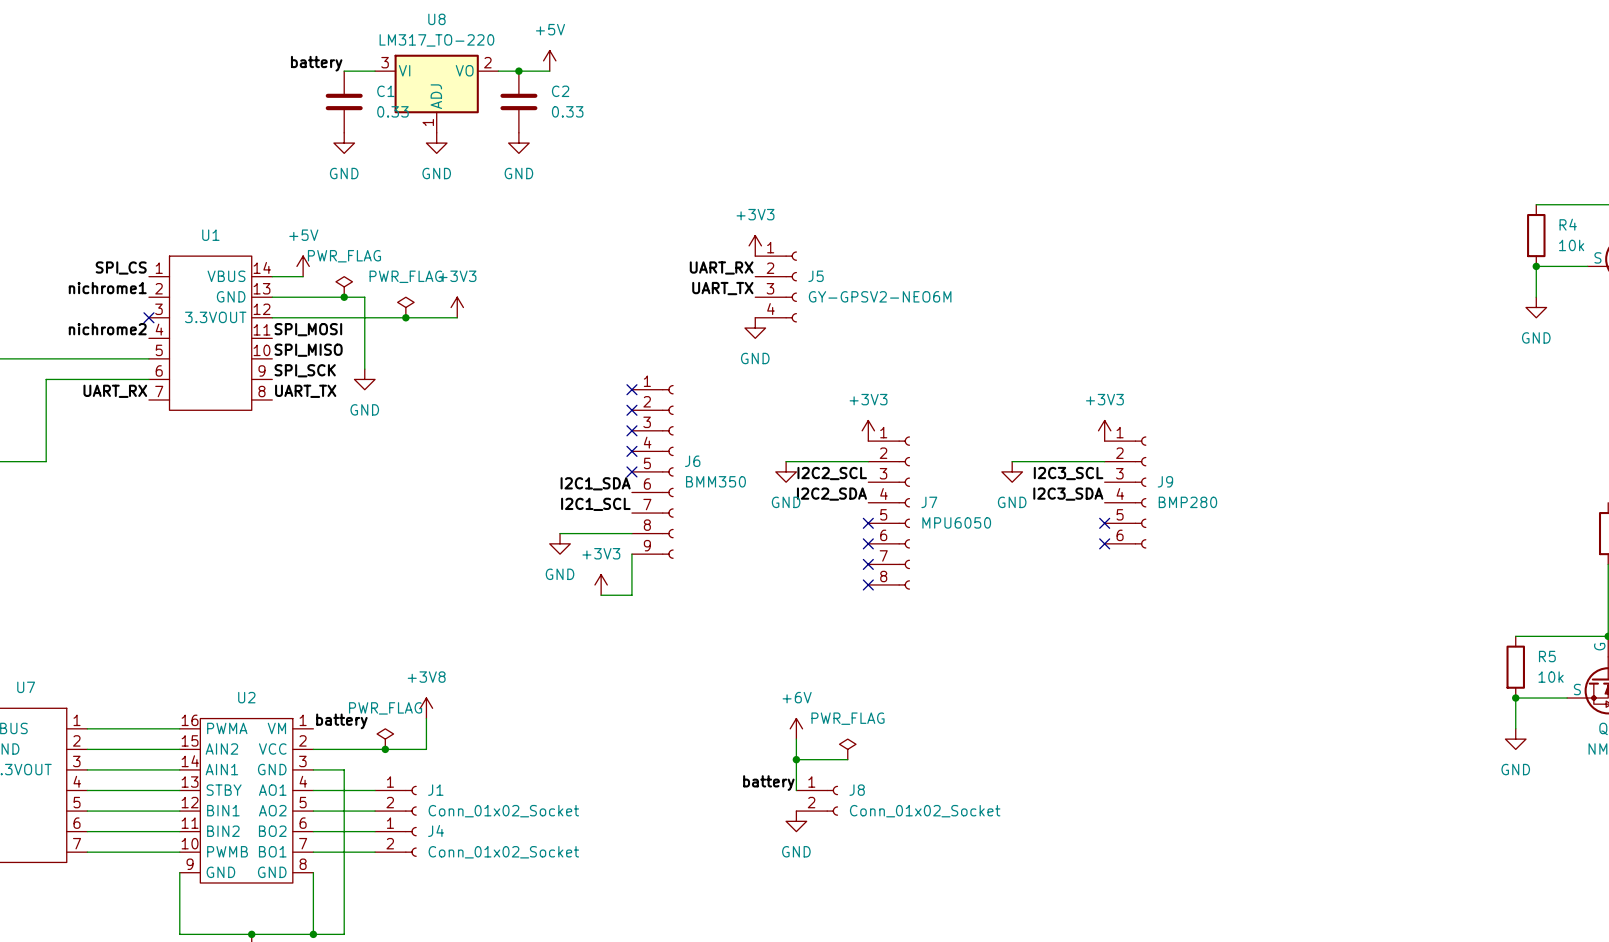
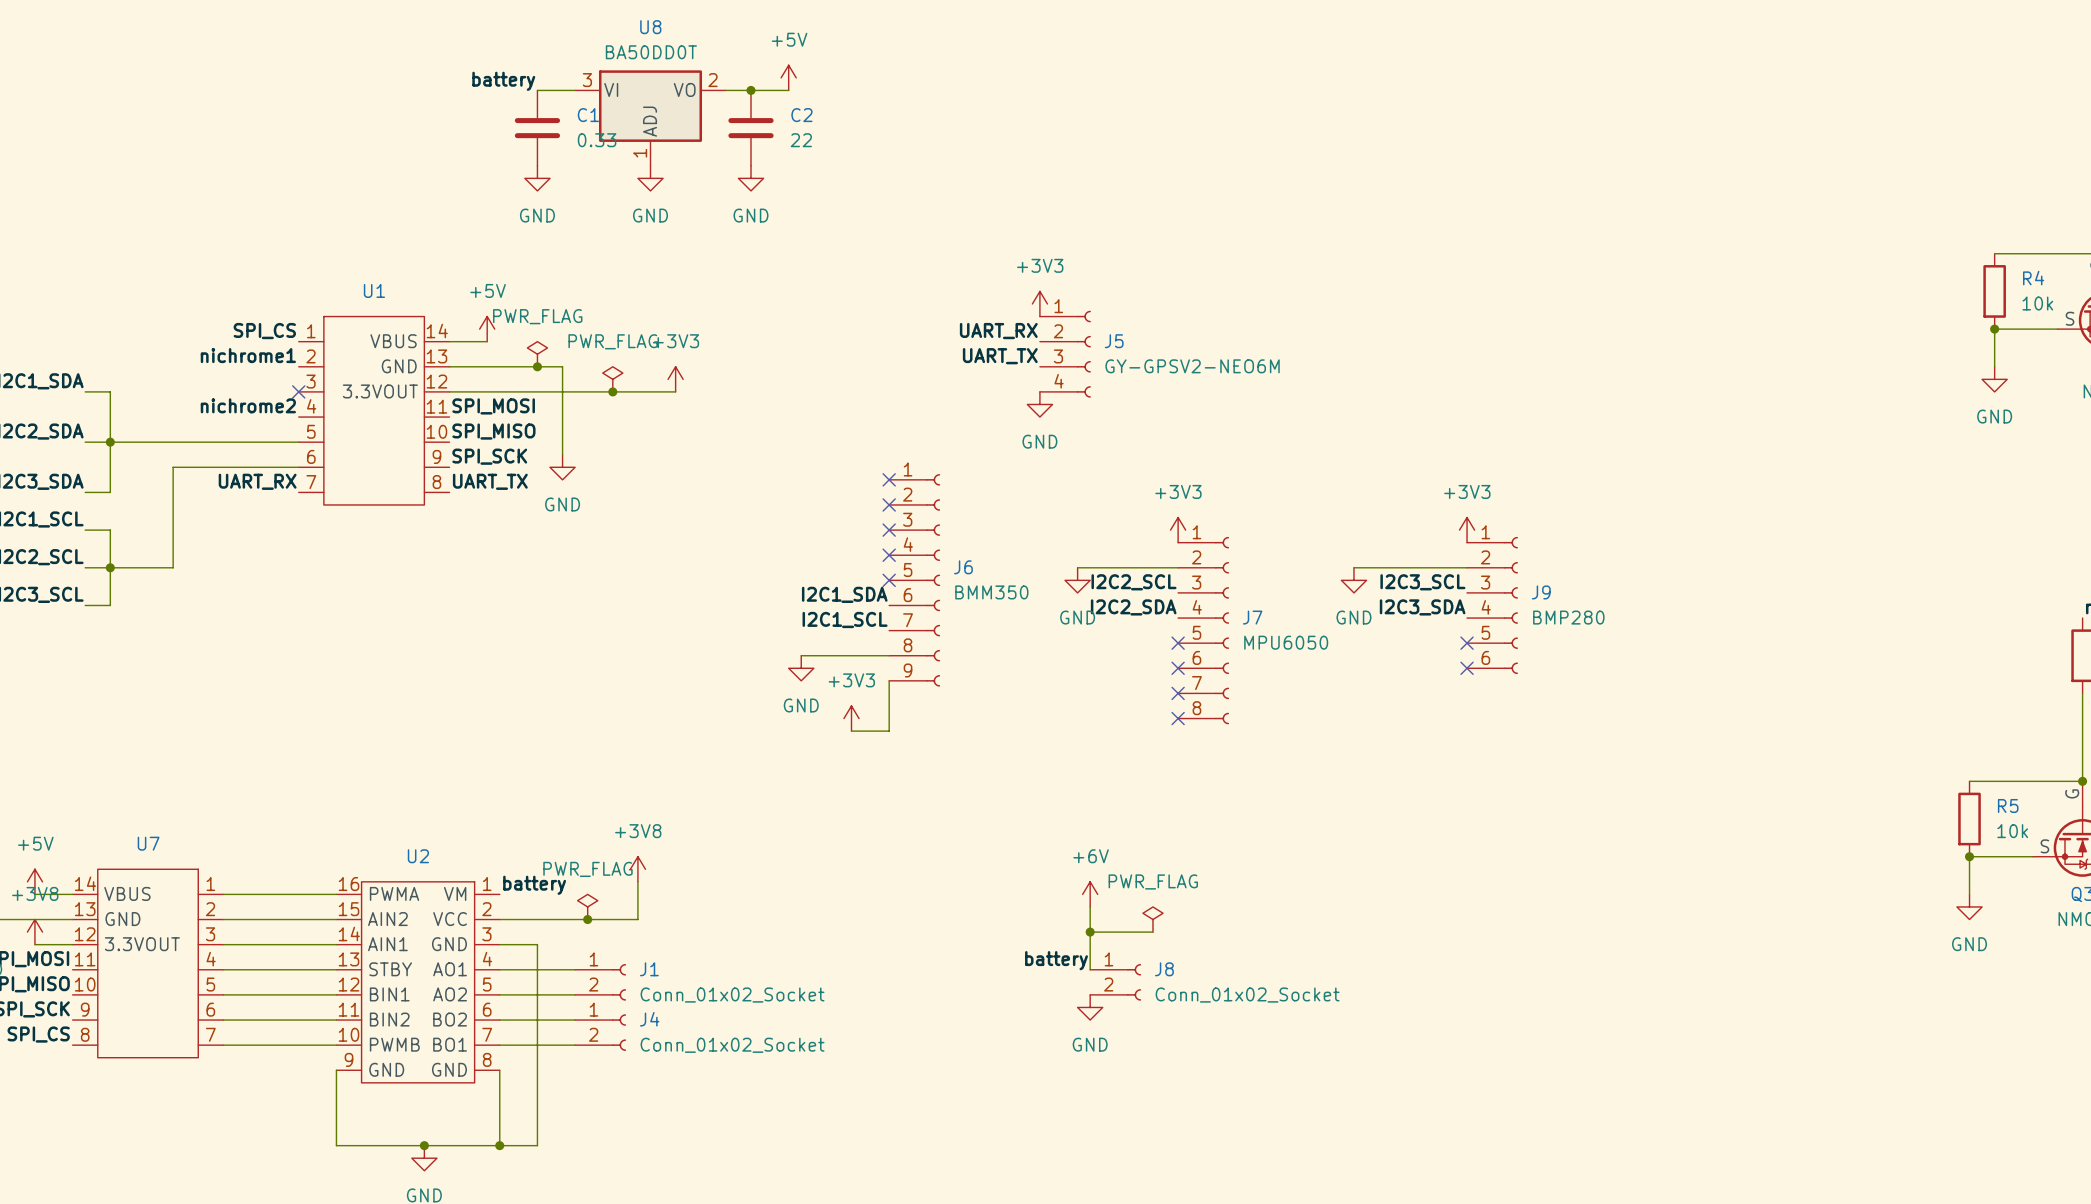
U8 value: LM317_TO-220 (436, 40) -> BA50DD0T (651, 52)
C2 value: 0.33 (567, 111) -> 22 (801, 140)

